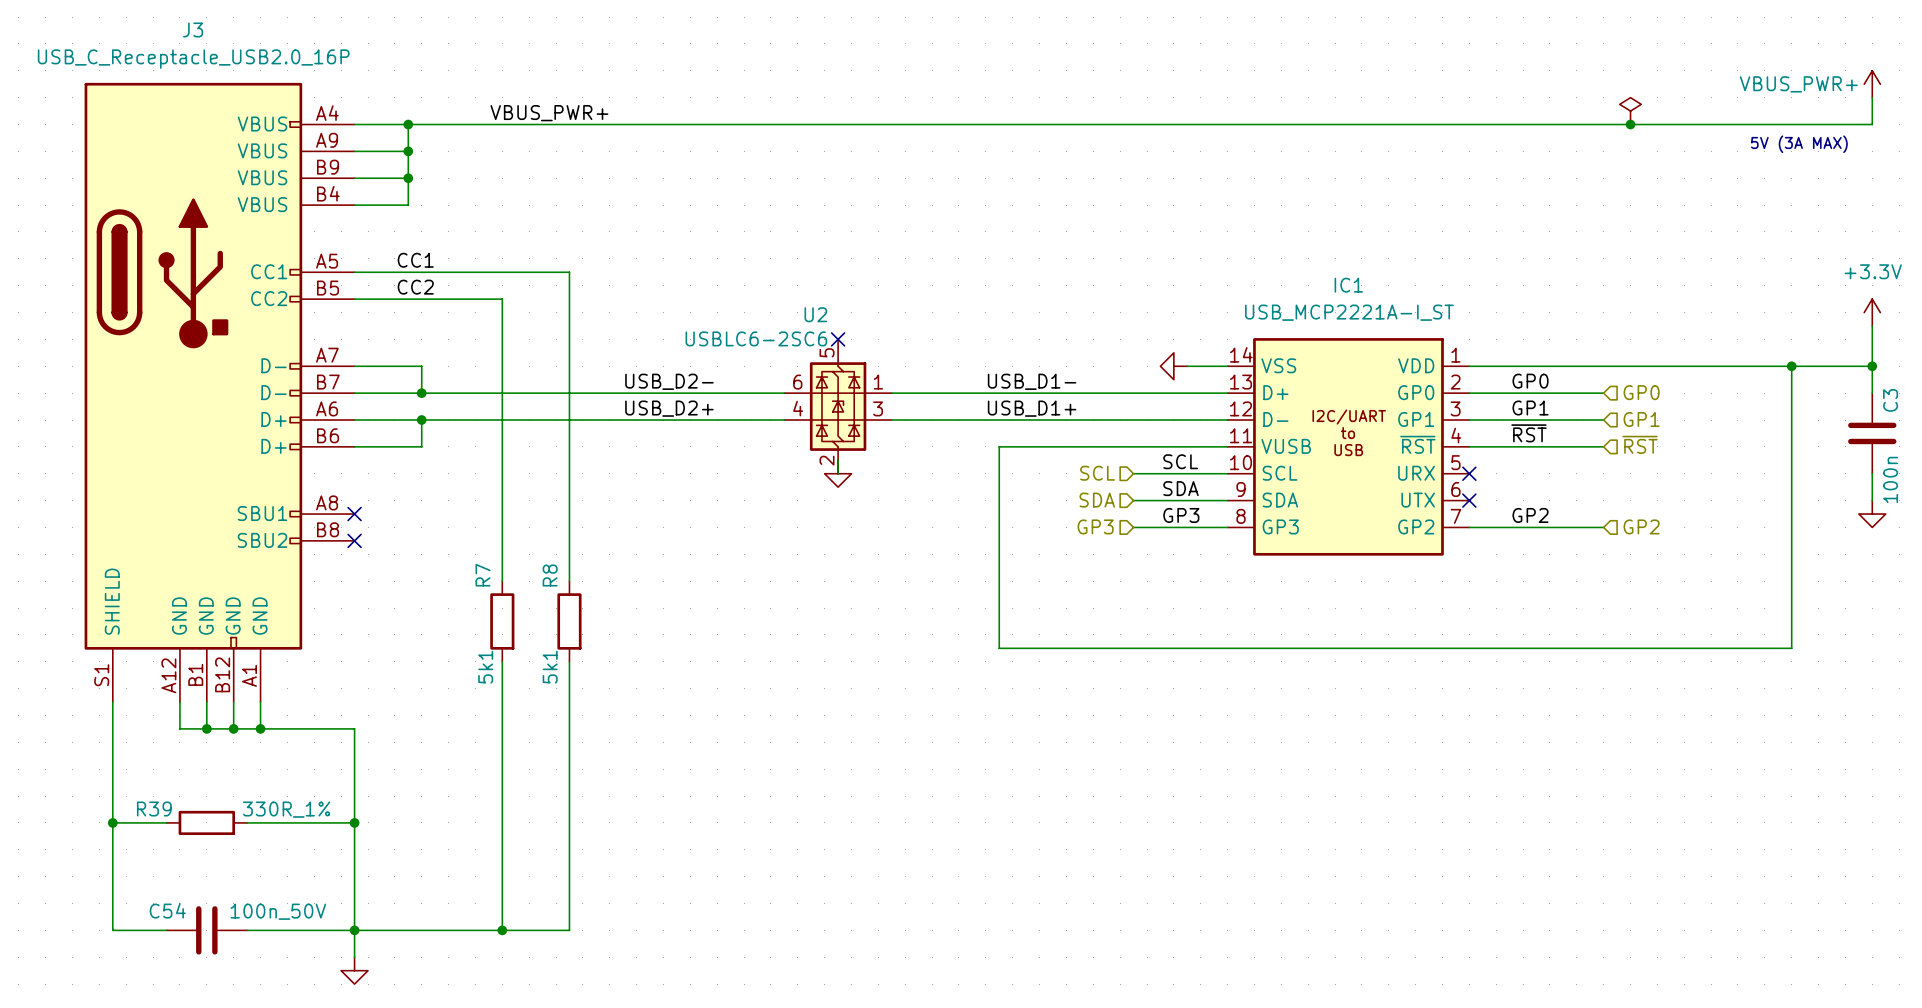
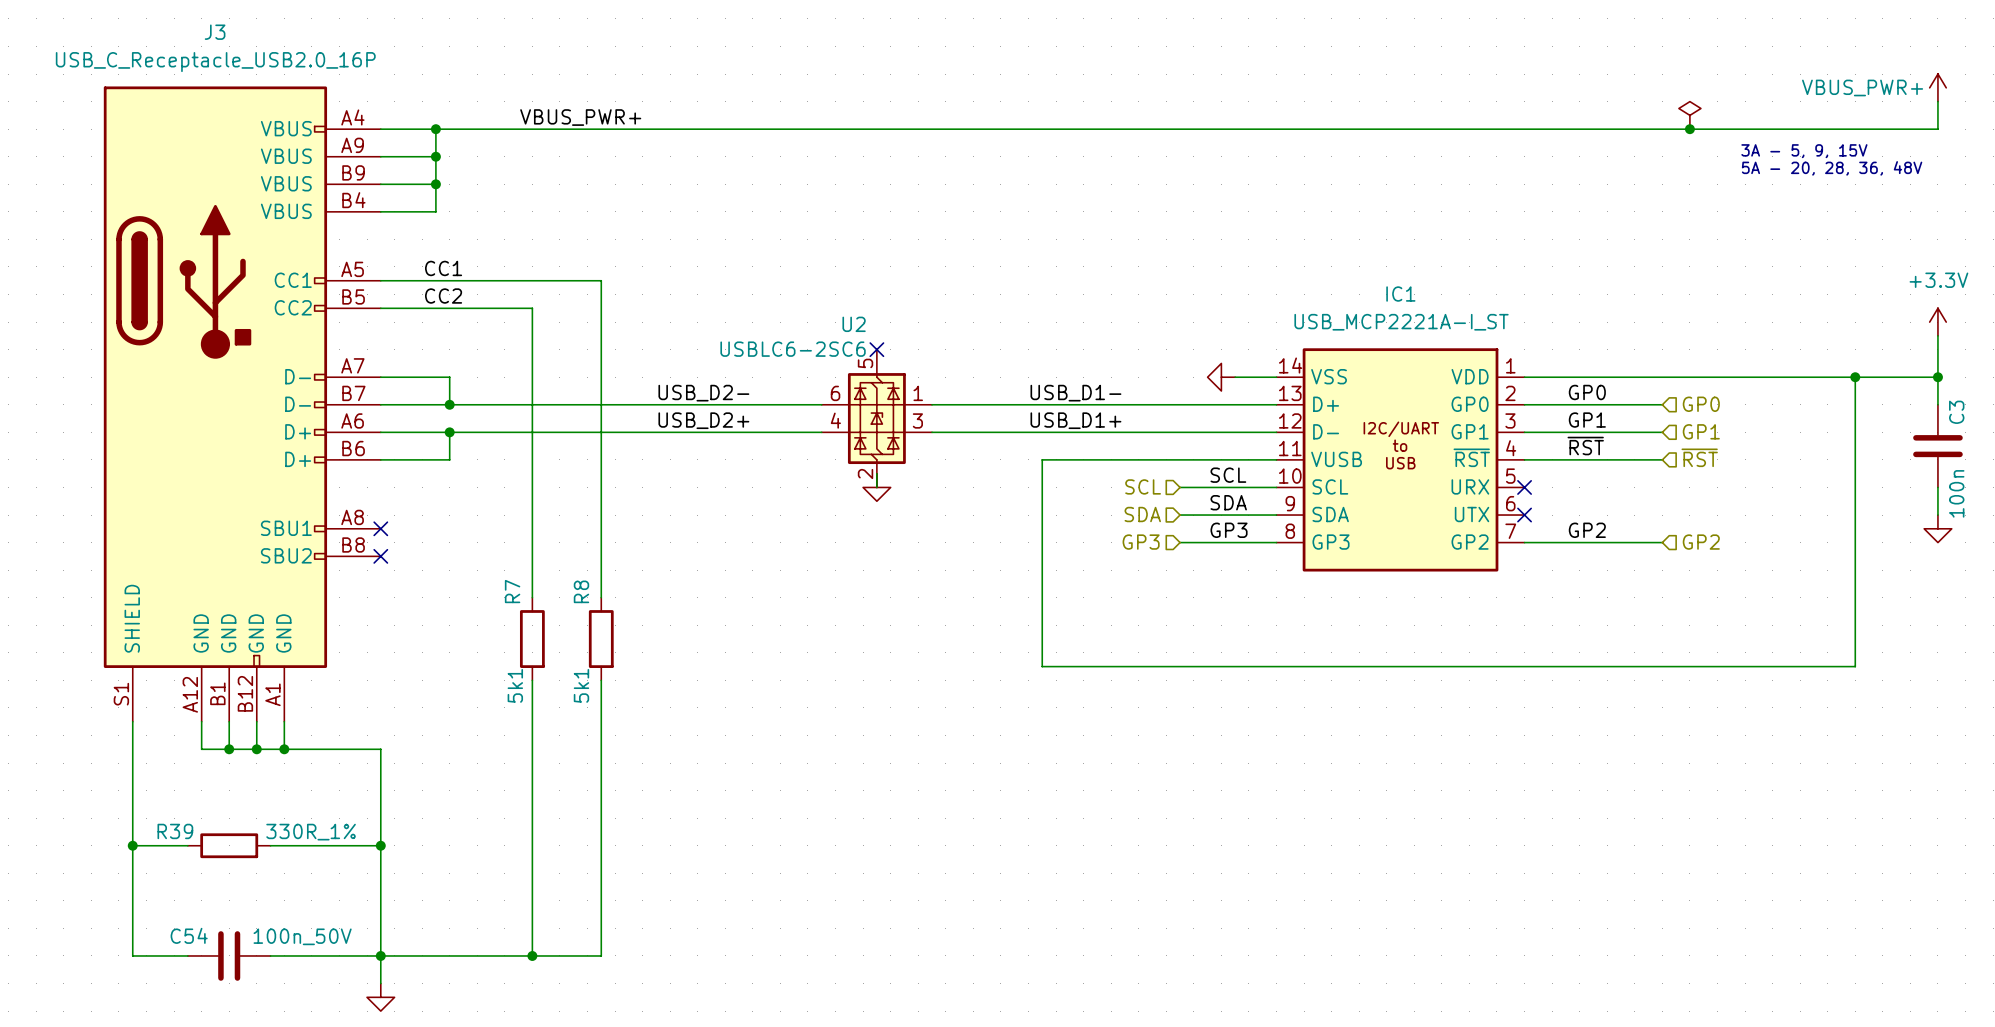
text: 5V (3A MAX) (1799, 144) -> none
text: none -> 3A - 5, 9, 15V (1804, 151)
text: none -> 5A - 20, 28, 36, 48V (1832, 168)

